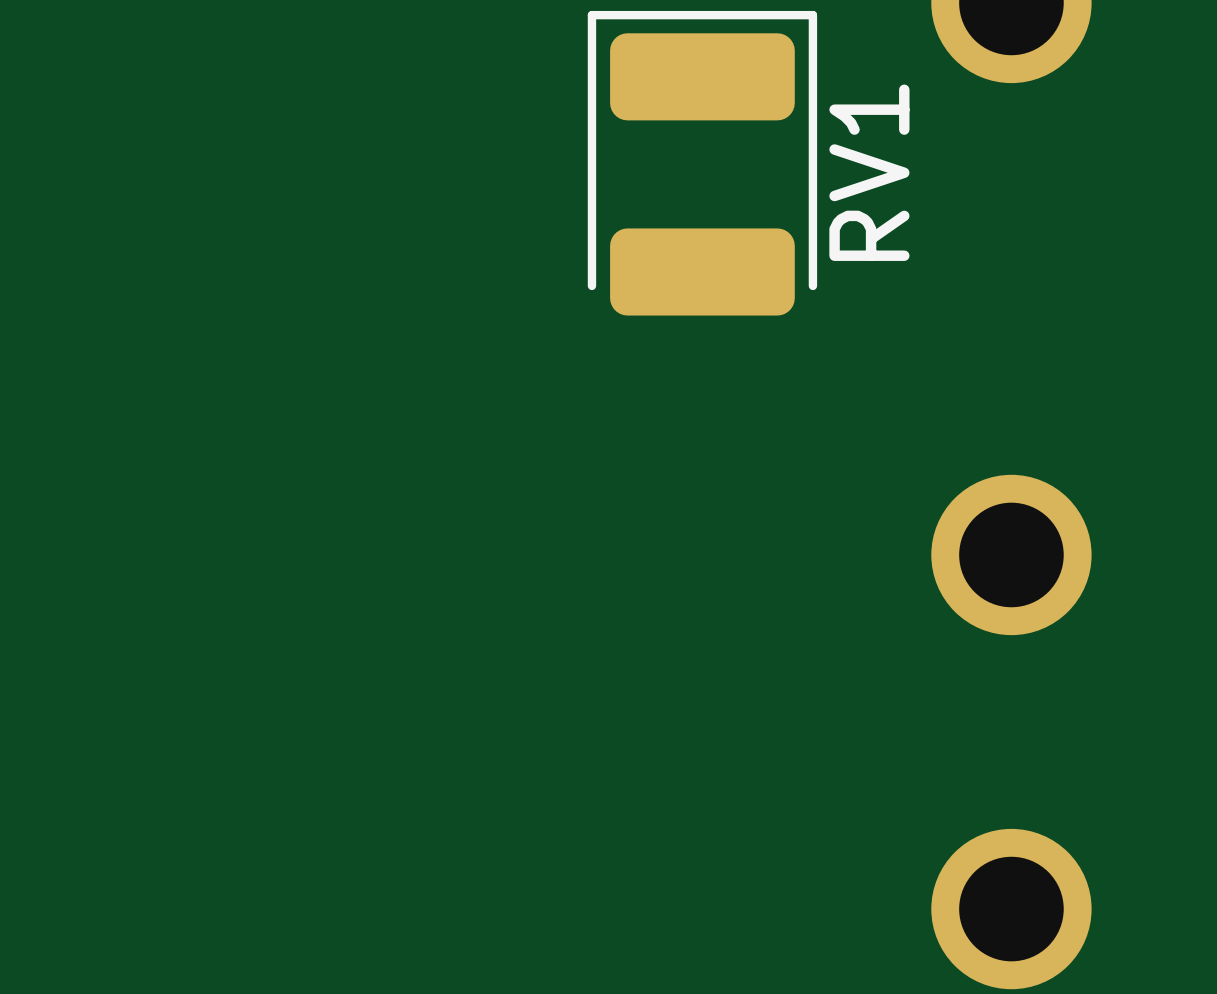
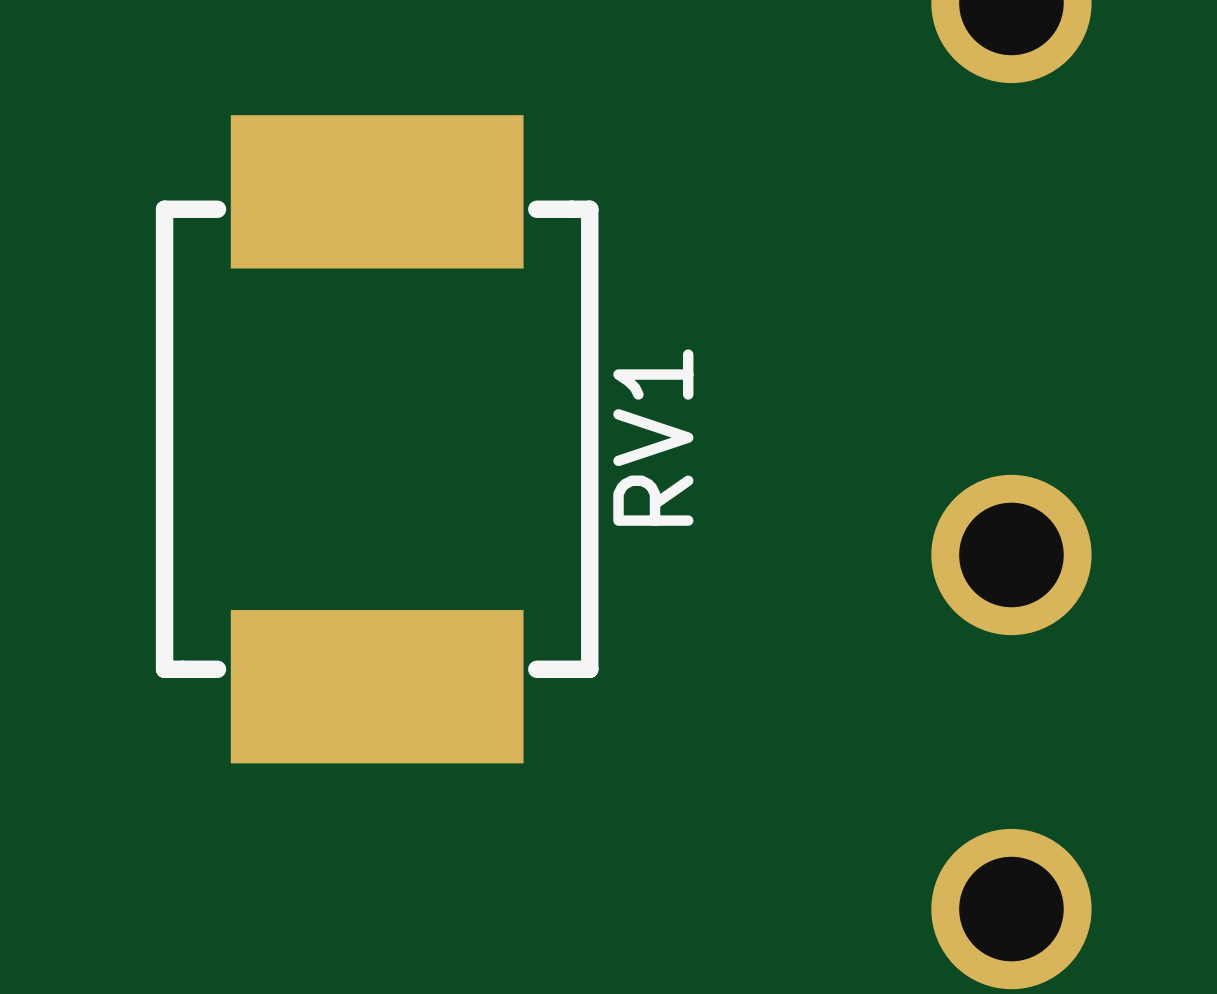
RV1 footprint: [587, 10, 818, 316] -> [155, 115, 599, 764]

